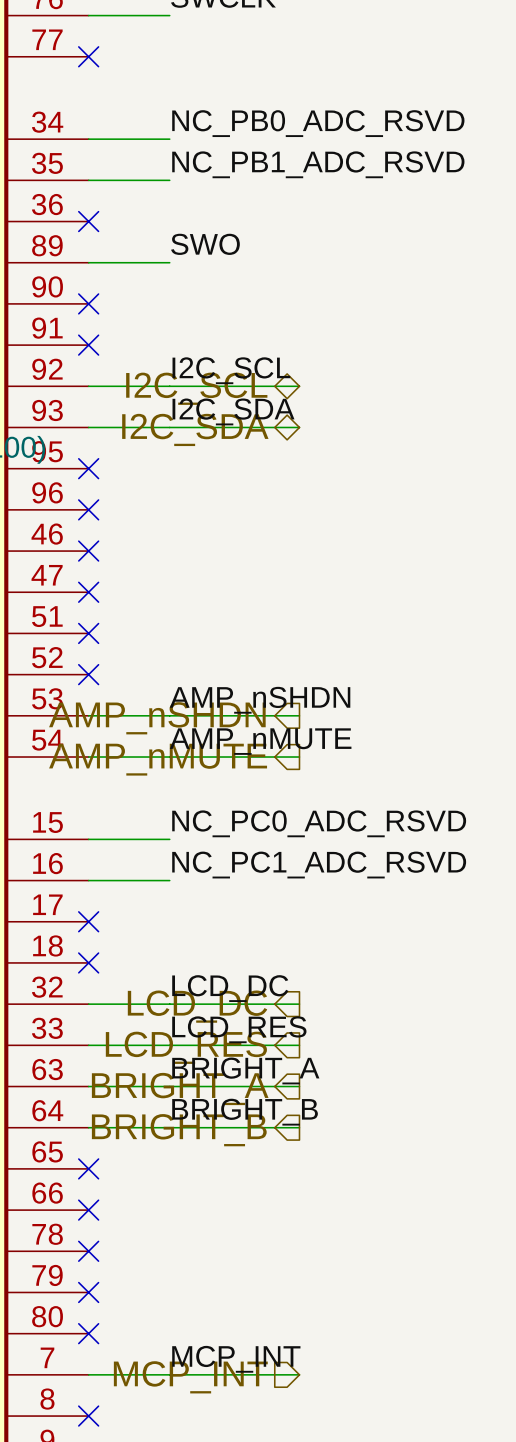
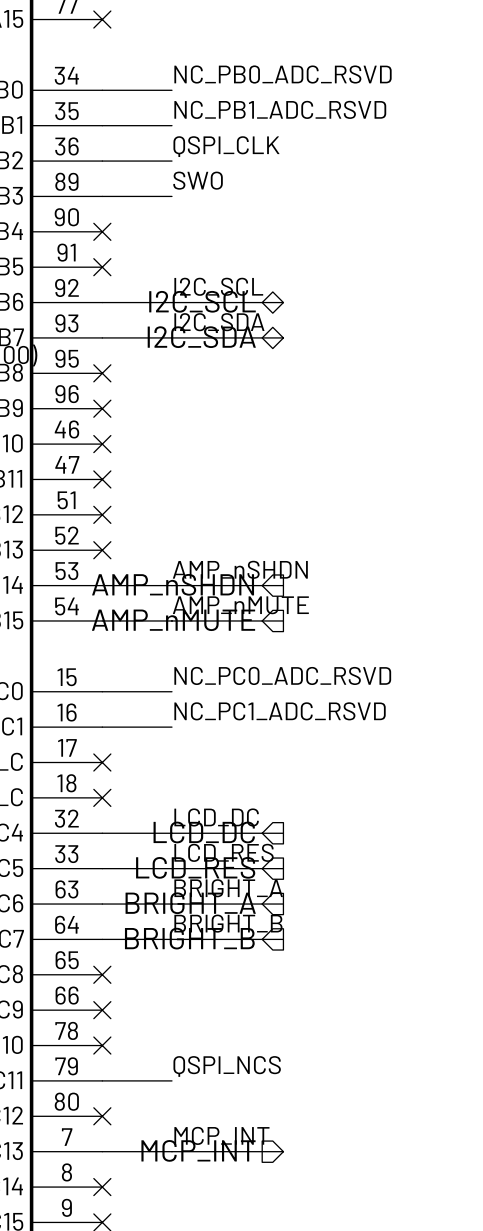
label: none -> QSPI_CLK (226, 146)
wire: none -> (102, 161) (171, 161)
no-connect mark: (88, 221) -> none
label: none -> QSPI_NCS (227, 1066)
wire: none -> (102, 1080) (171, 1080)
no-connect mark: (88, 1292) -> none

